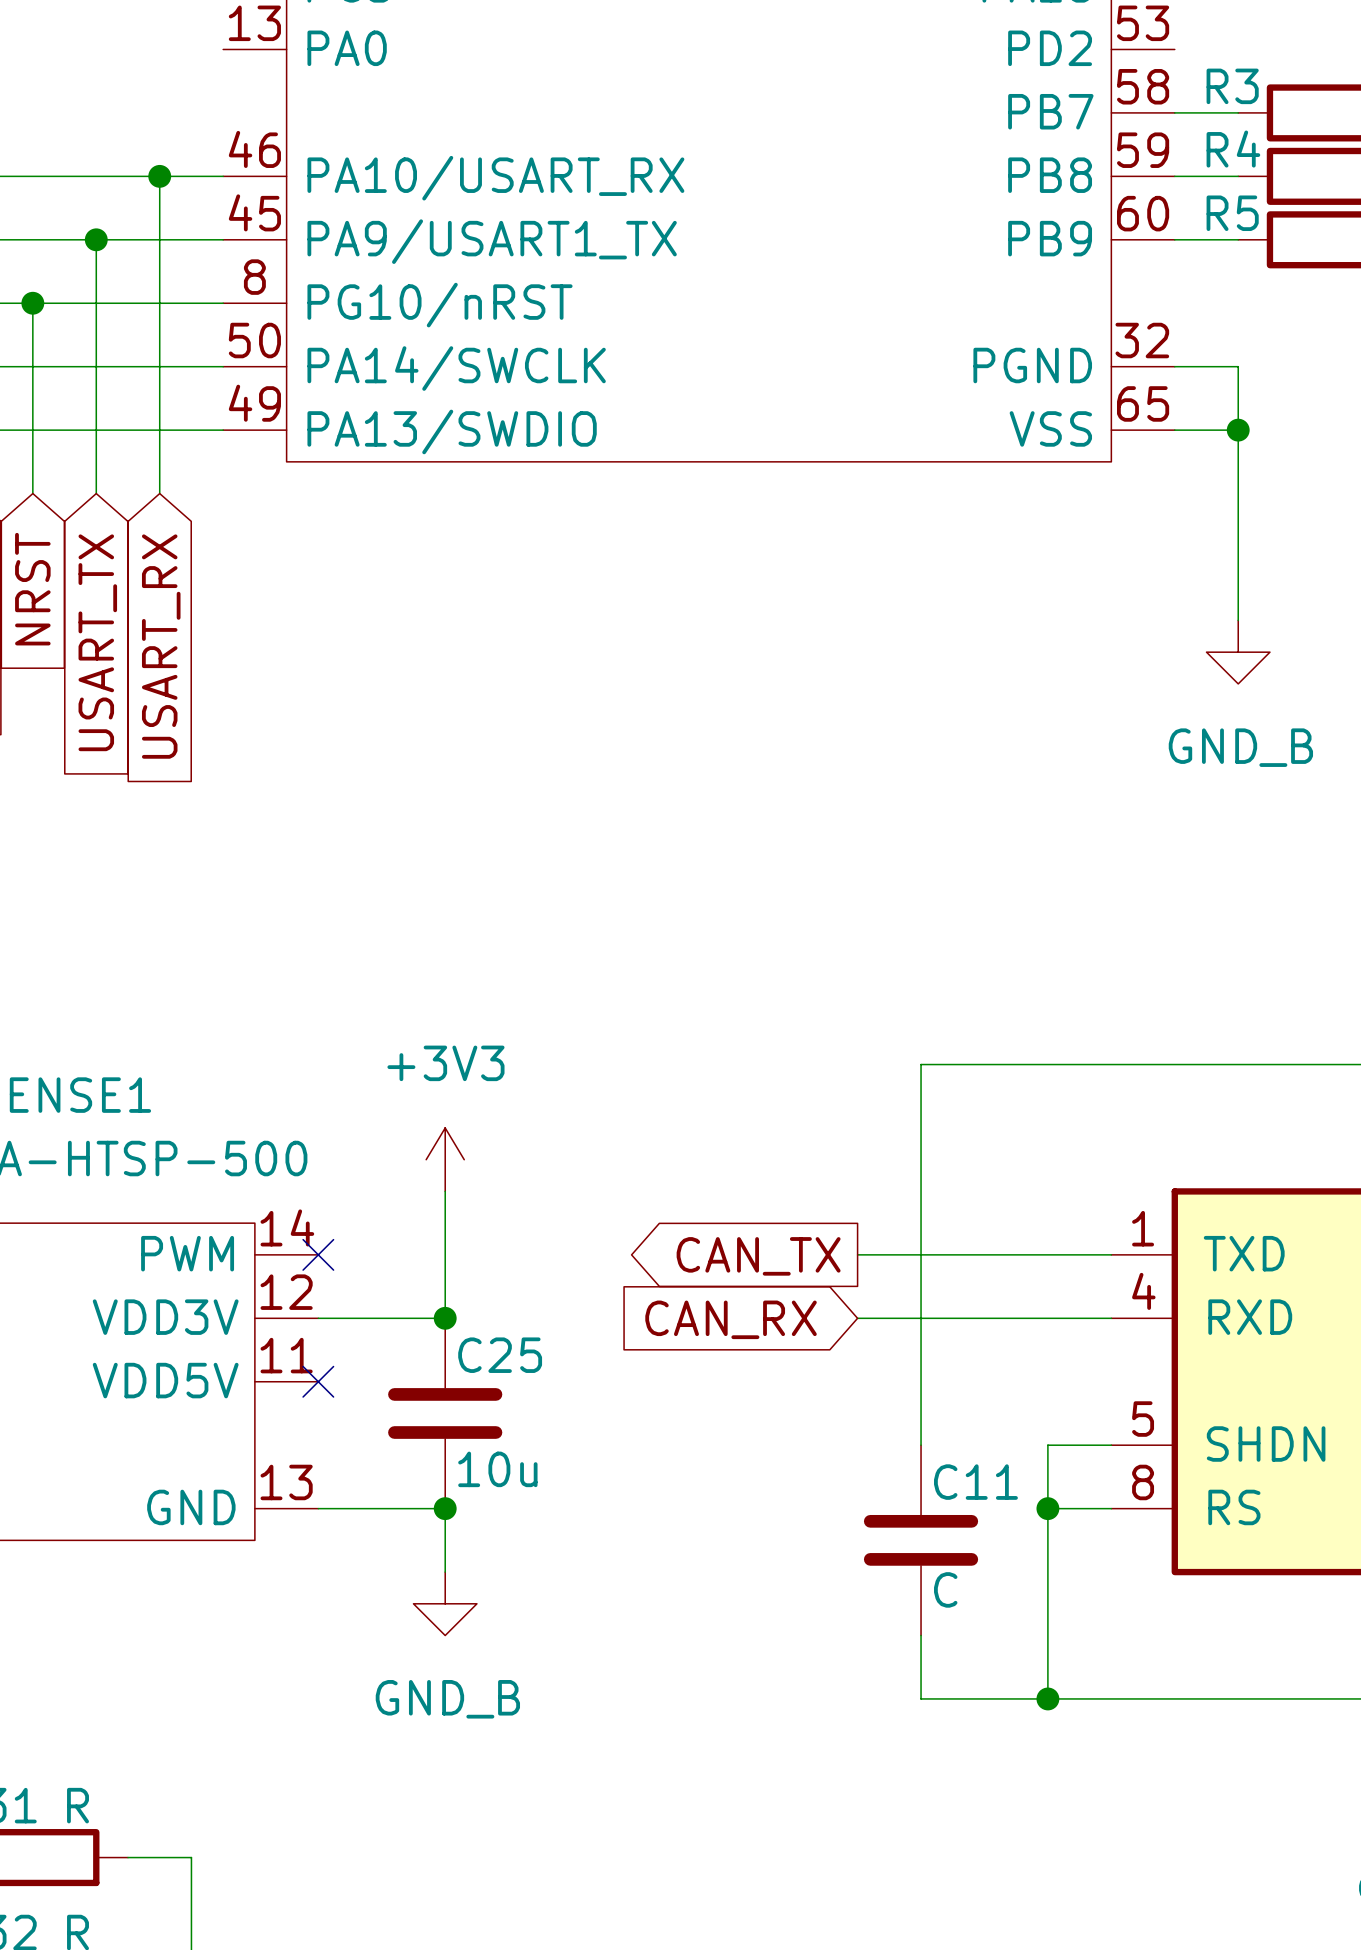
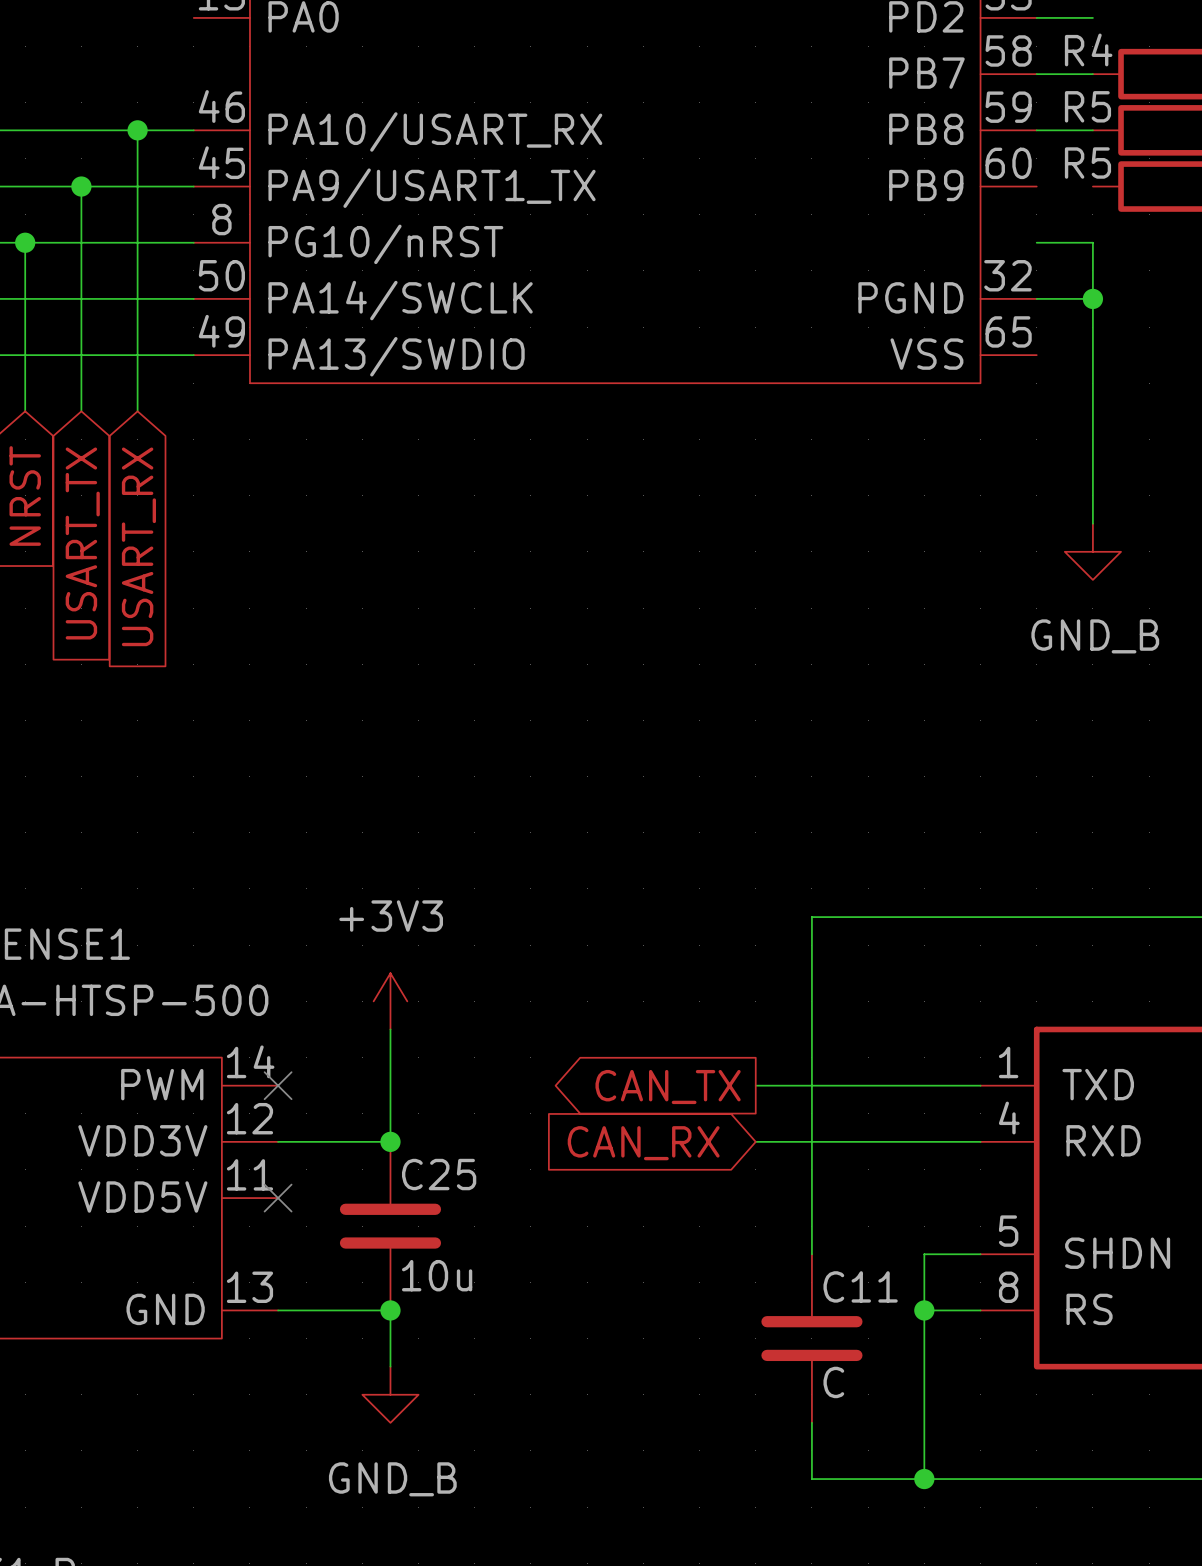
R3 name: R3 (1232, 86) -> R4 (1088, 49)
R4 name: R4 (1233, 149) -> R5 (1087, 106)
wire: (1174, 239) (1238, 239) -> (1036, 17) (1092, 17)
wire: none -> (1036, 242) (1092, 242) (1092, 298)
wire: (1174, 430) (1238, 430) -> none
junction position: (1238, 430) -> (1092, 298)

